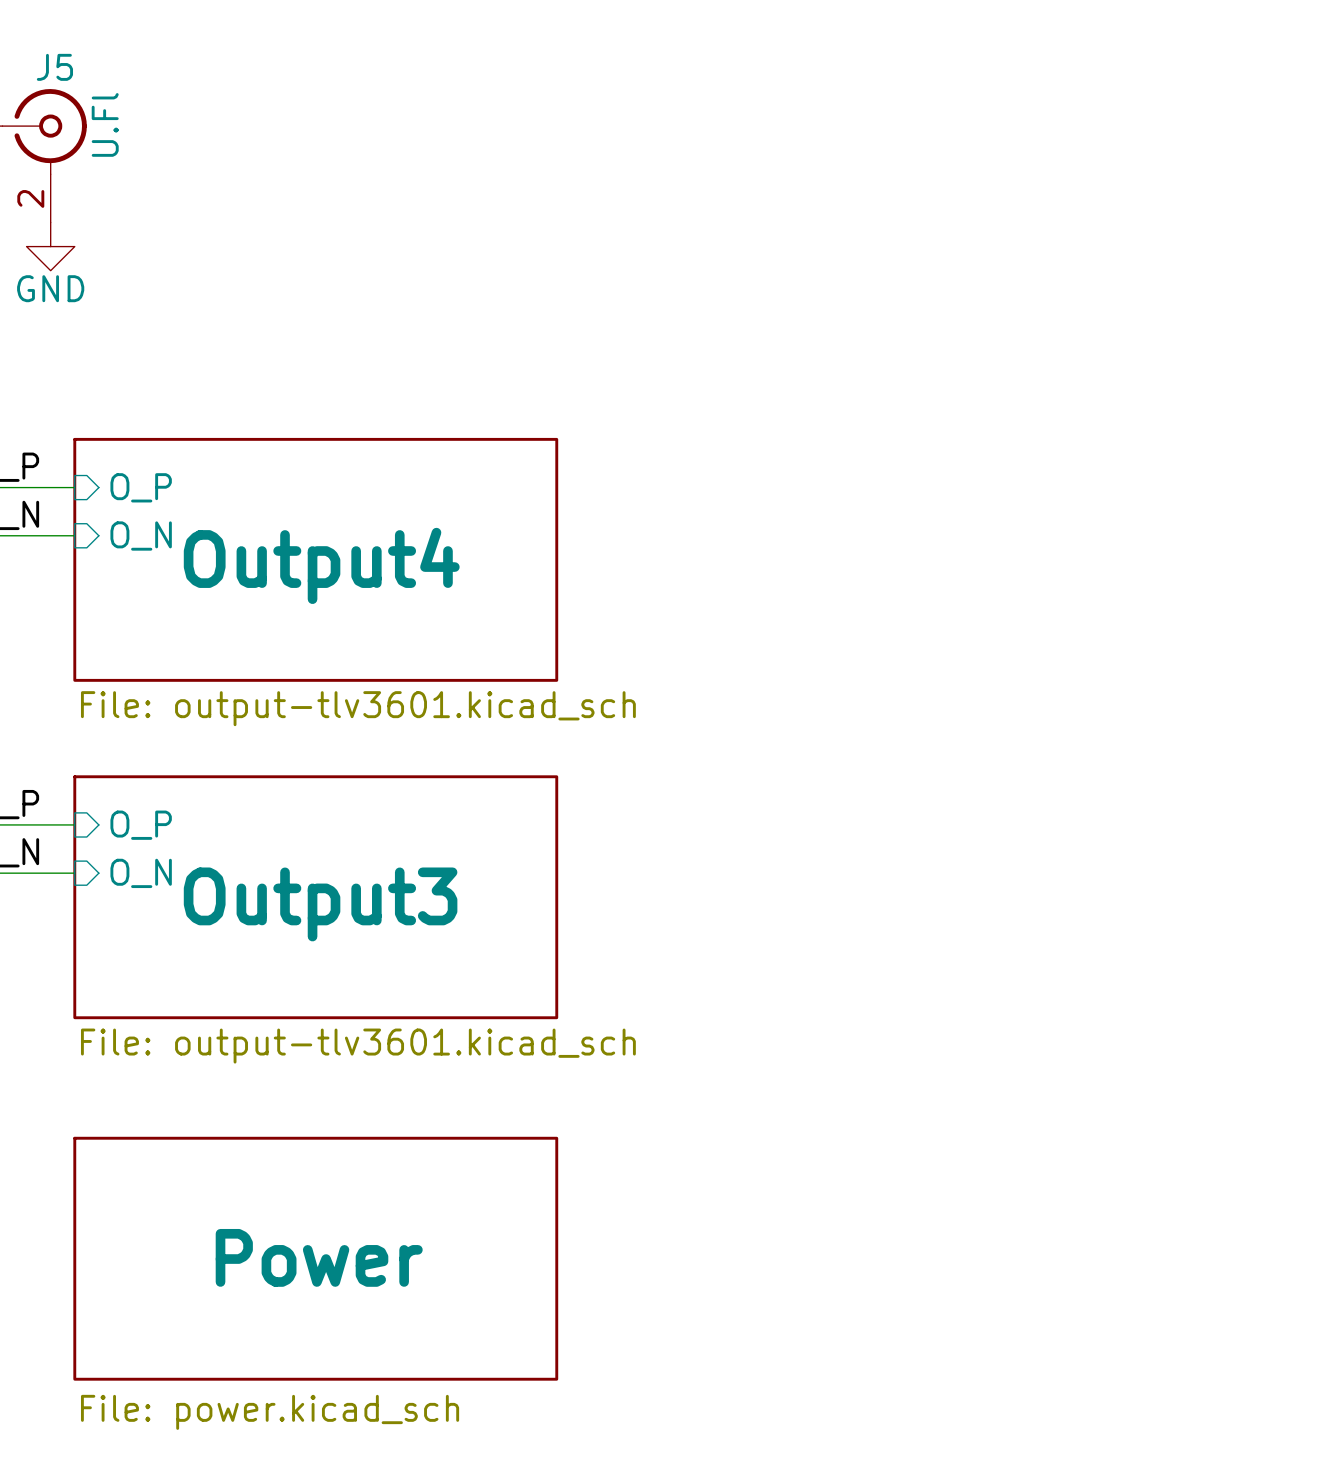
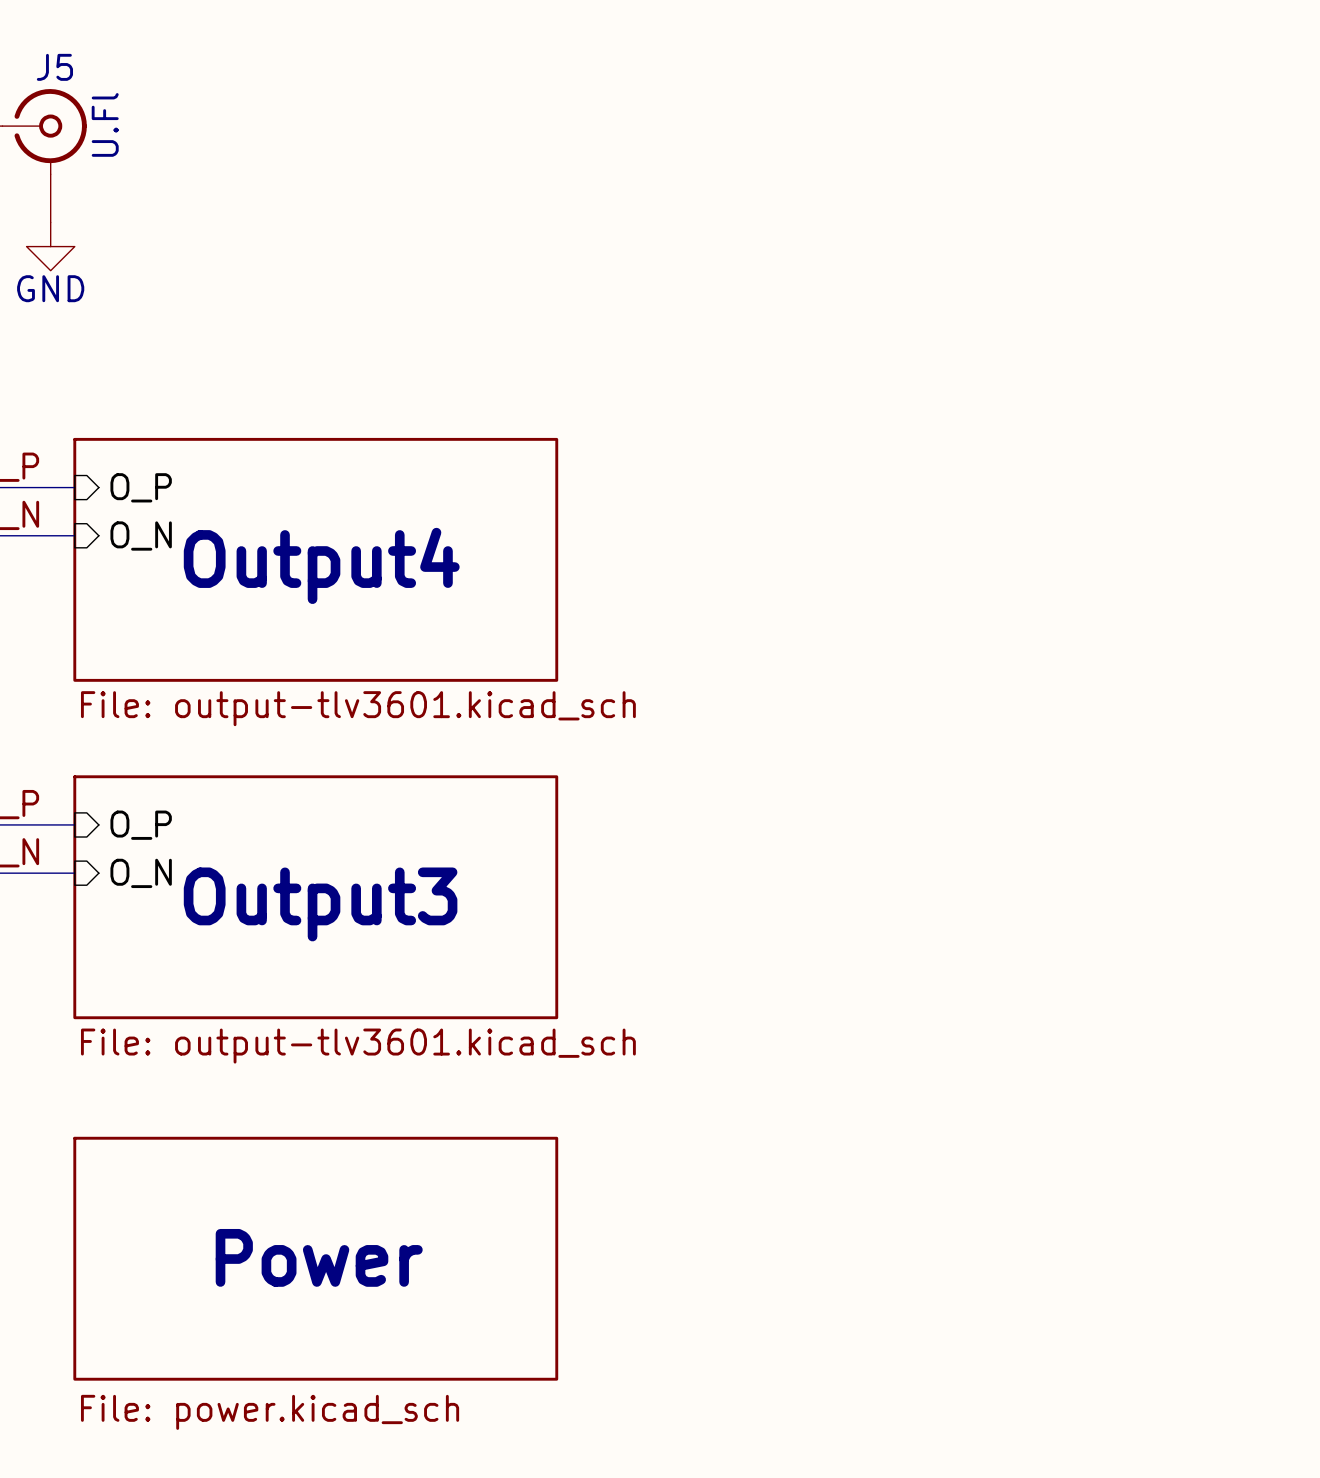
J5 pin number: 2 (30, 198) -> none

